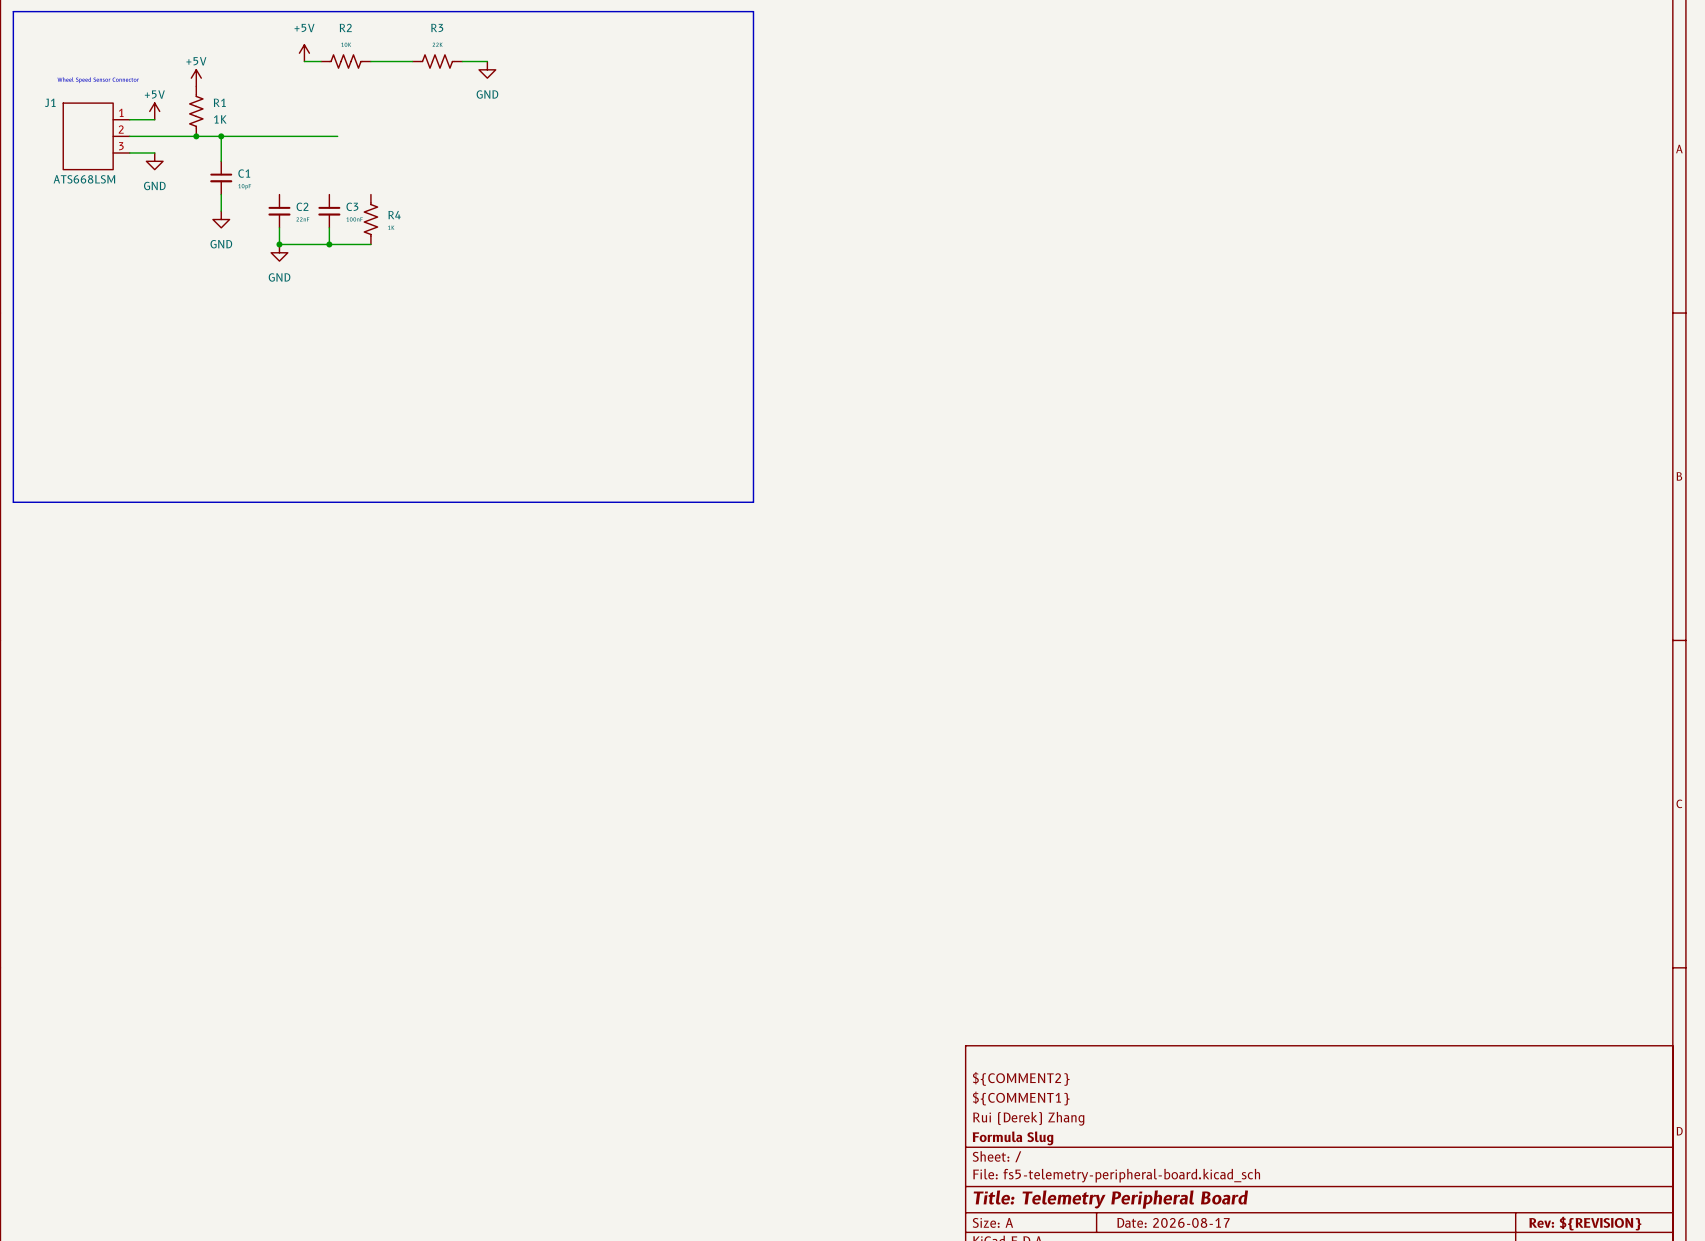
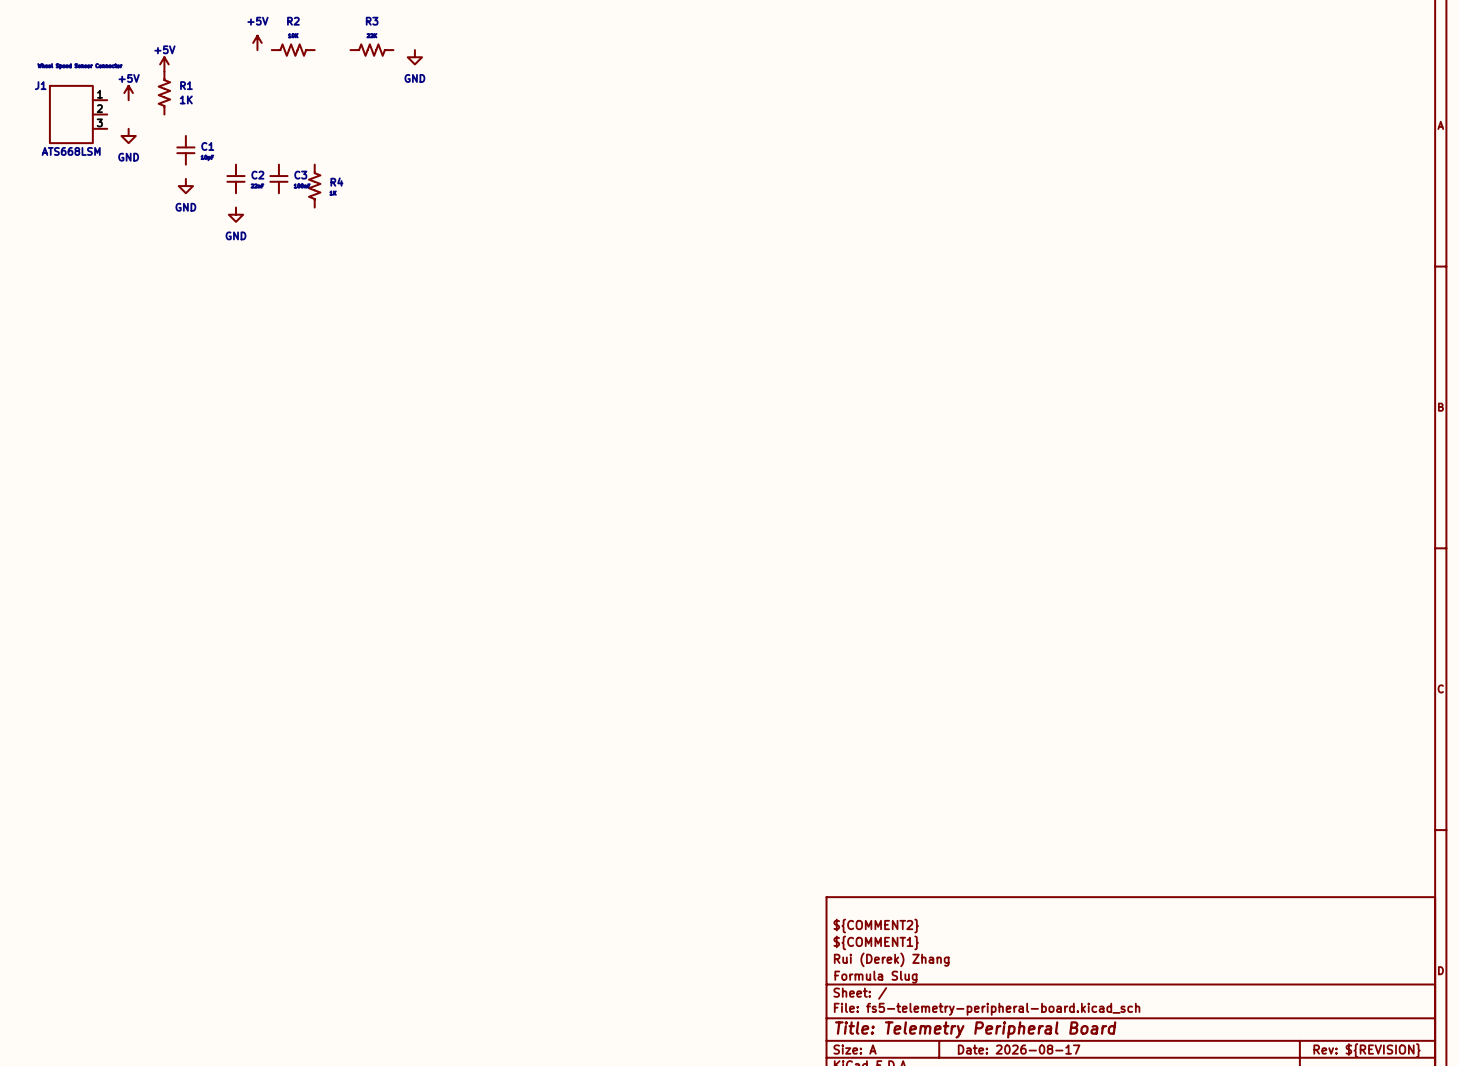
line: (13, 11) (753, 11) (753, 502) (13, 502) (13, 11) -> none
wire: (304, 61) (321, 61) -> none
wire: (370, 61) (412, 61) -> none
wire: (462, 61) (487, 61) -> none
wire: (129, 119) (154, 119) -> none
wire: (129, 136) (337, 136) -> none
junction: (196, 136) -> none
wire: (221, 136) (221, 161) -> none
junction: (221, 136) -> none
wire: (129, 152) (154, 152) -> none
wire: (221, 194) (221, 211) -> none
wire: (279, 227) (279, 244) (370, 244) -> none
wire: (329, 227) (329, 244) -> none
junction: (279, 244) -> none
junction: (329, 244) -> none

